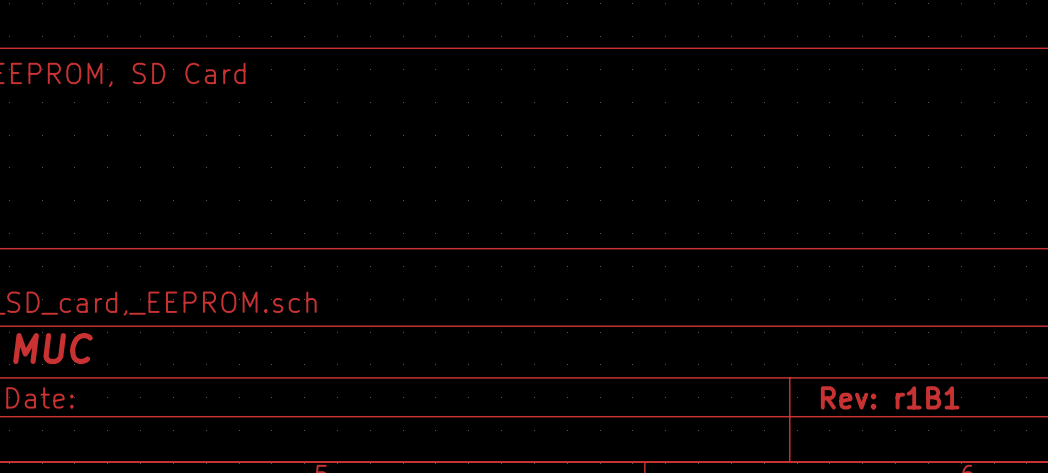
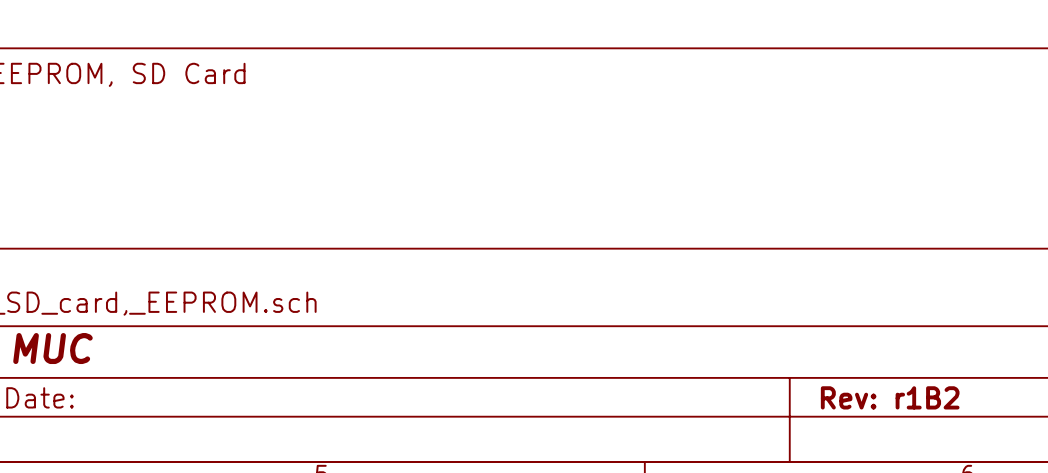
title block: Rev: r1B1 (890, 397) -> Rev: r1B2 (890, 397)

